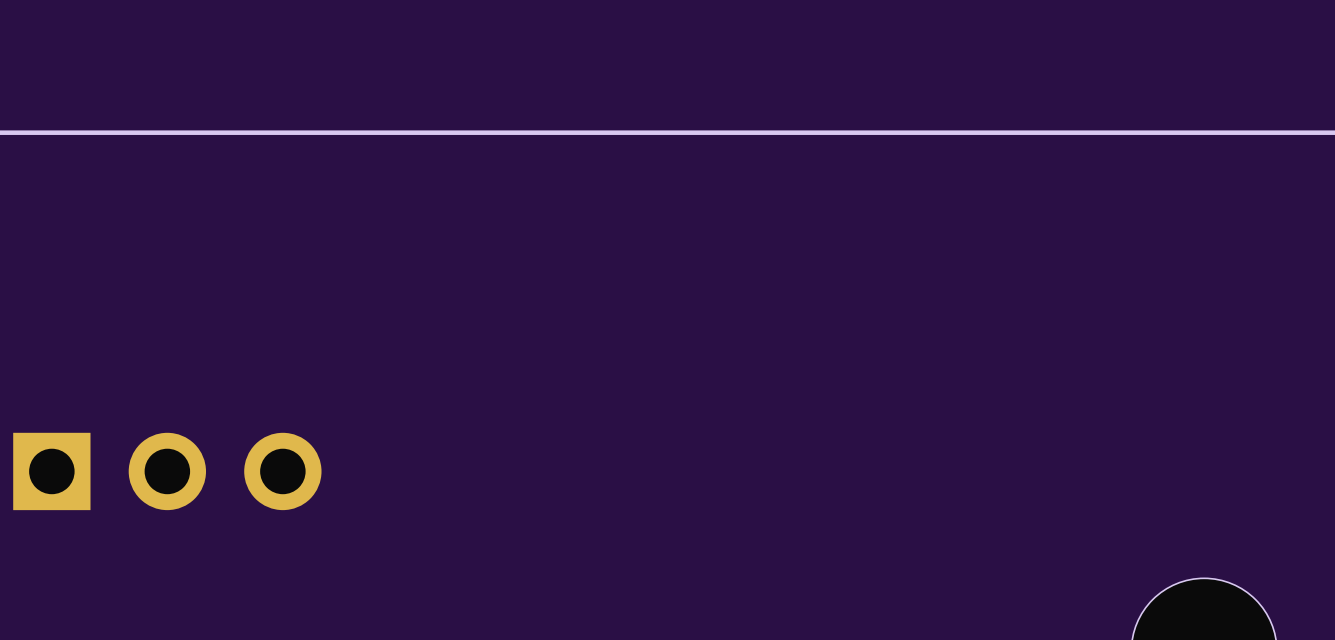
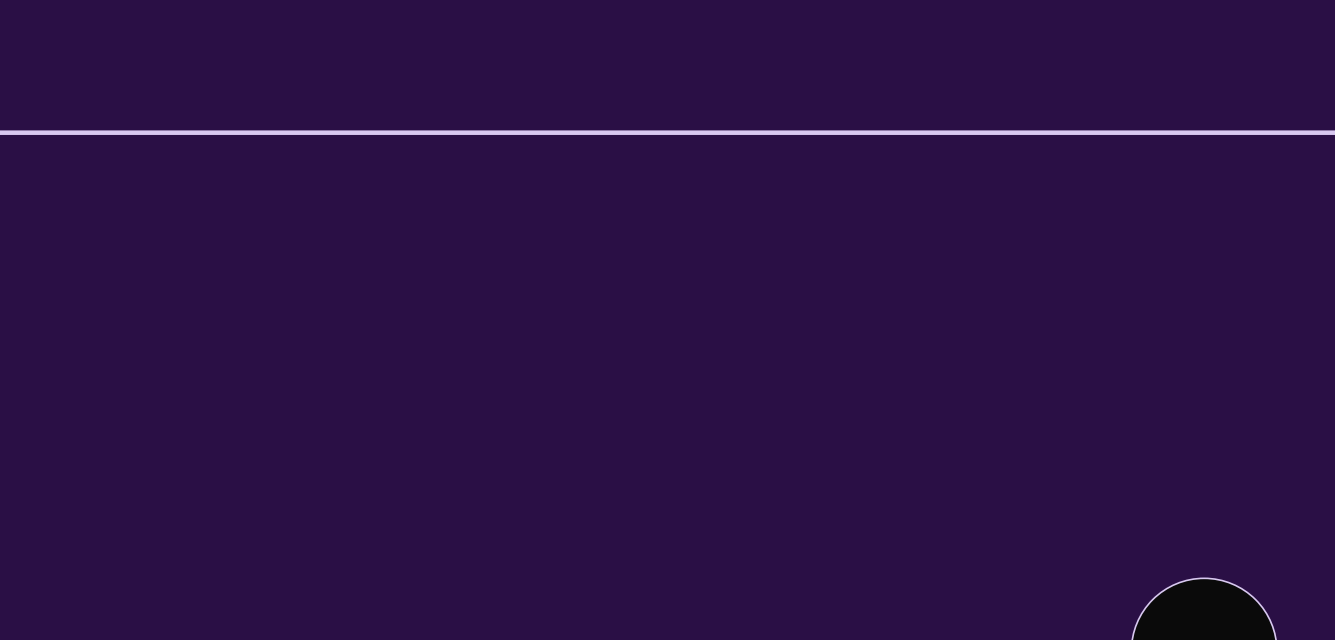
part: (167, 471) -> none

